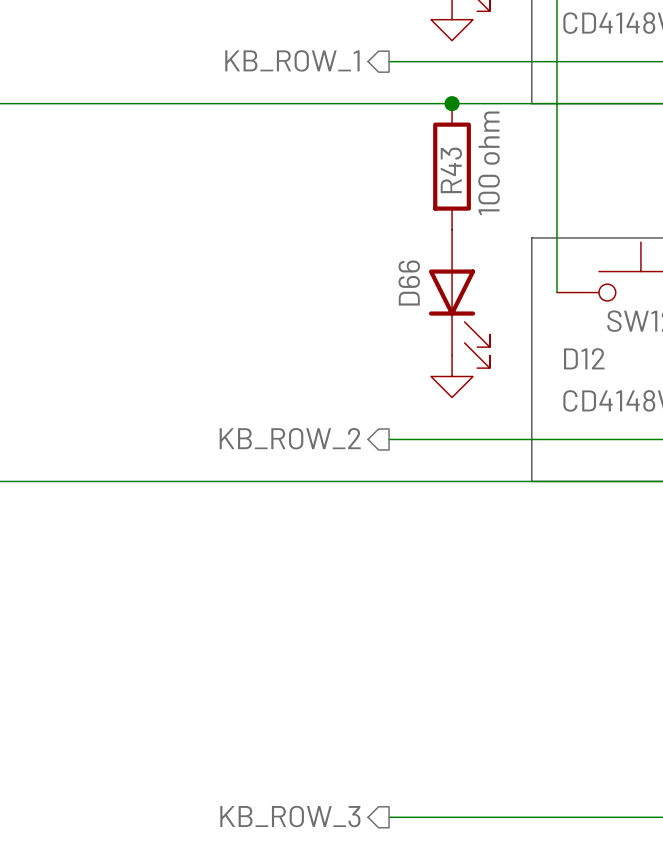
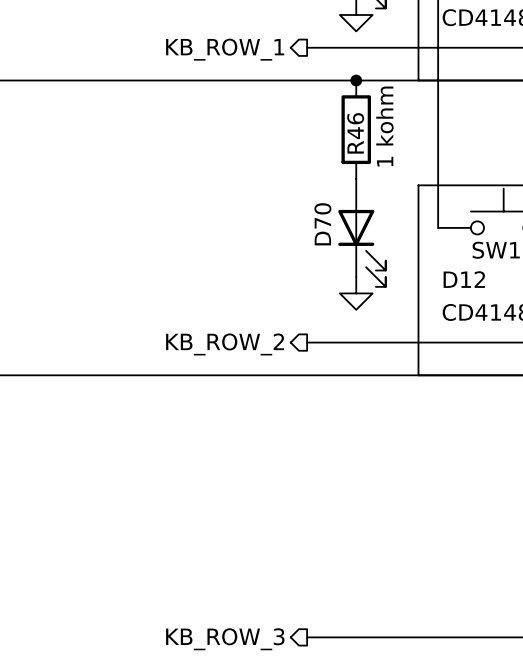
R43 value: 100 ohm (489, 163) -> 1 kohm (384, 126)
R43 name: R43 (451, 170) -> R46 (355, 133)
D66 name: D66 (409, 283) -> D70 (322, 224)

